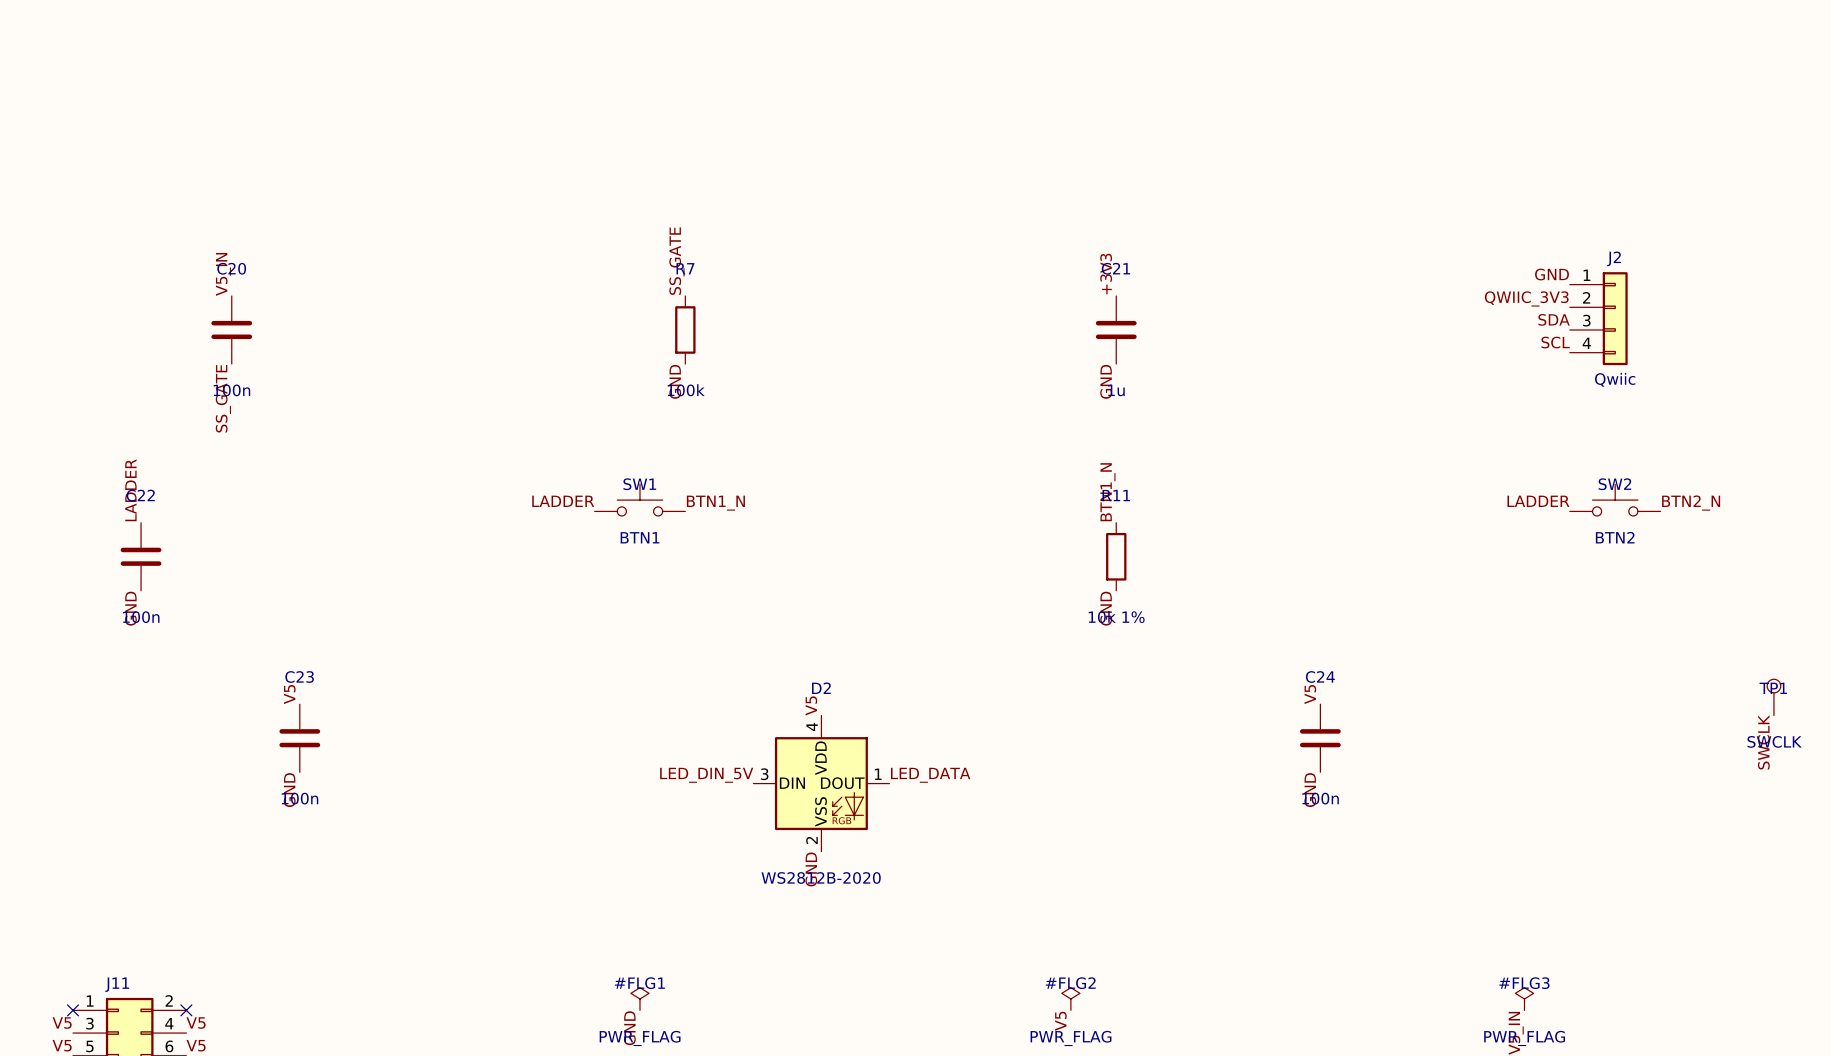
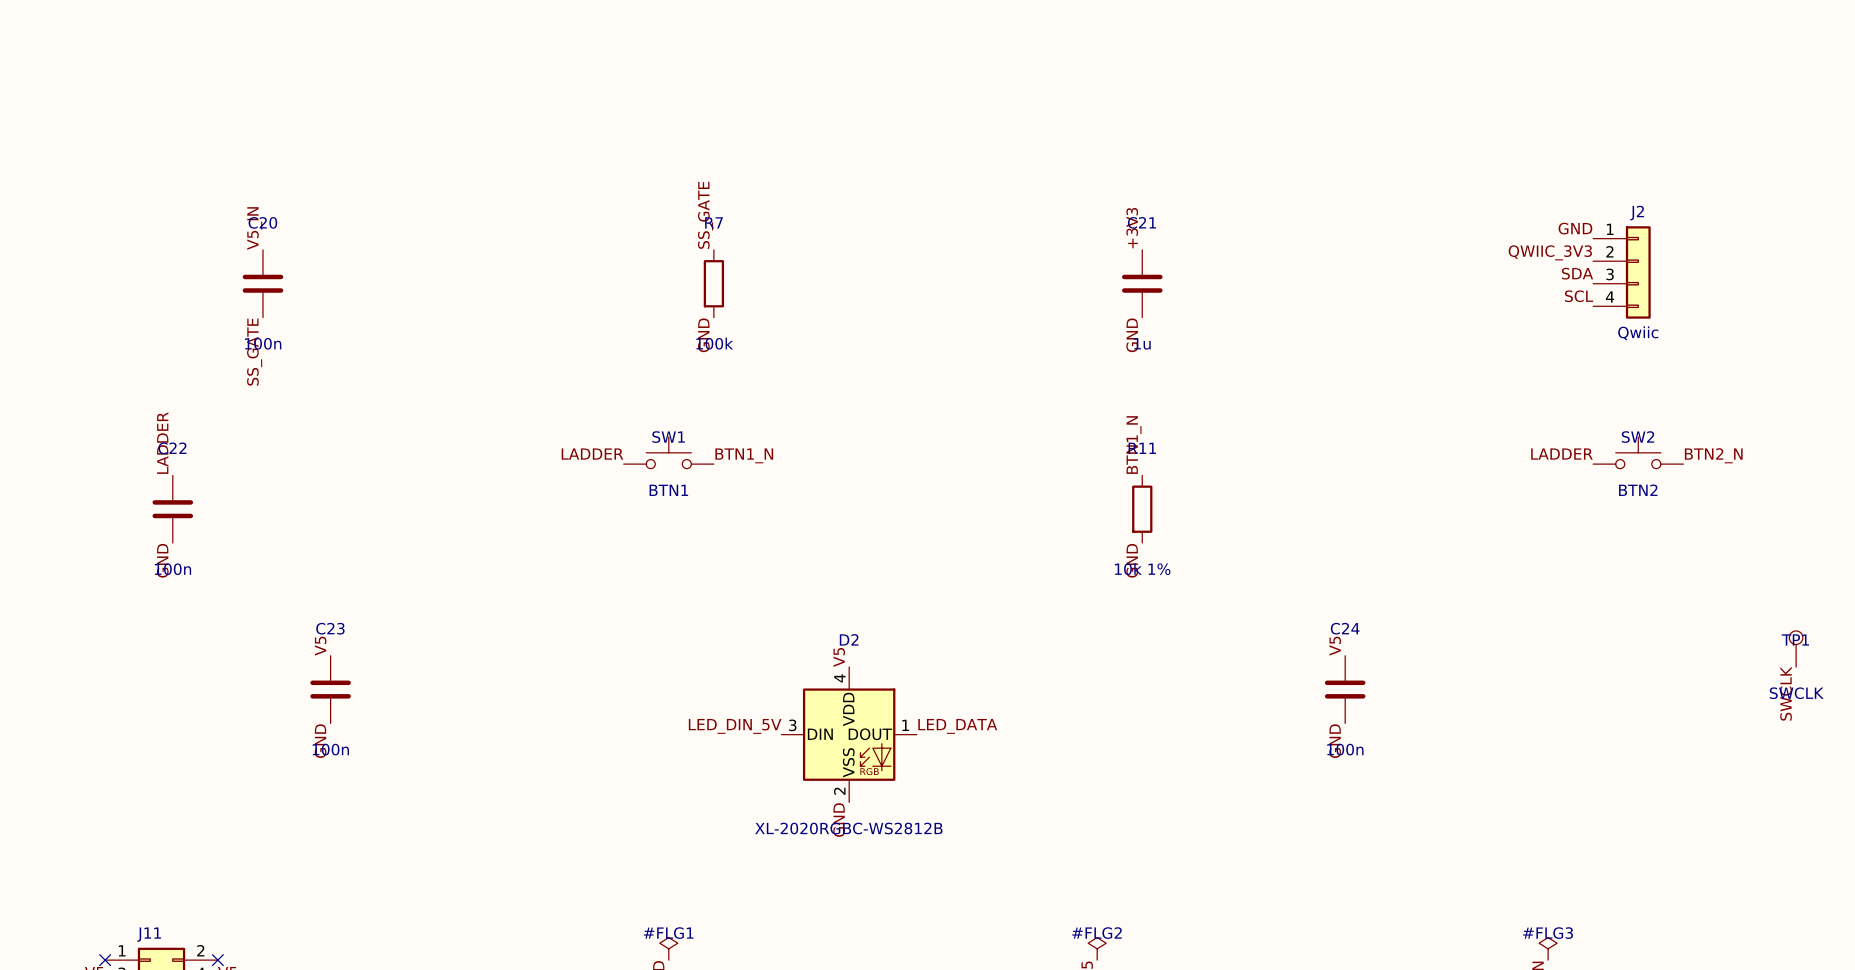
D2 value: WS2812B-2020 (821, 877) -> XL-2020RGBC-WS2812B (848, 828)

